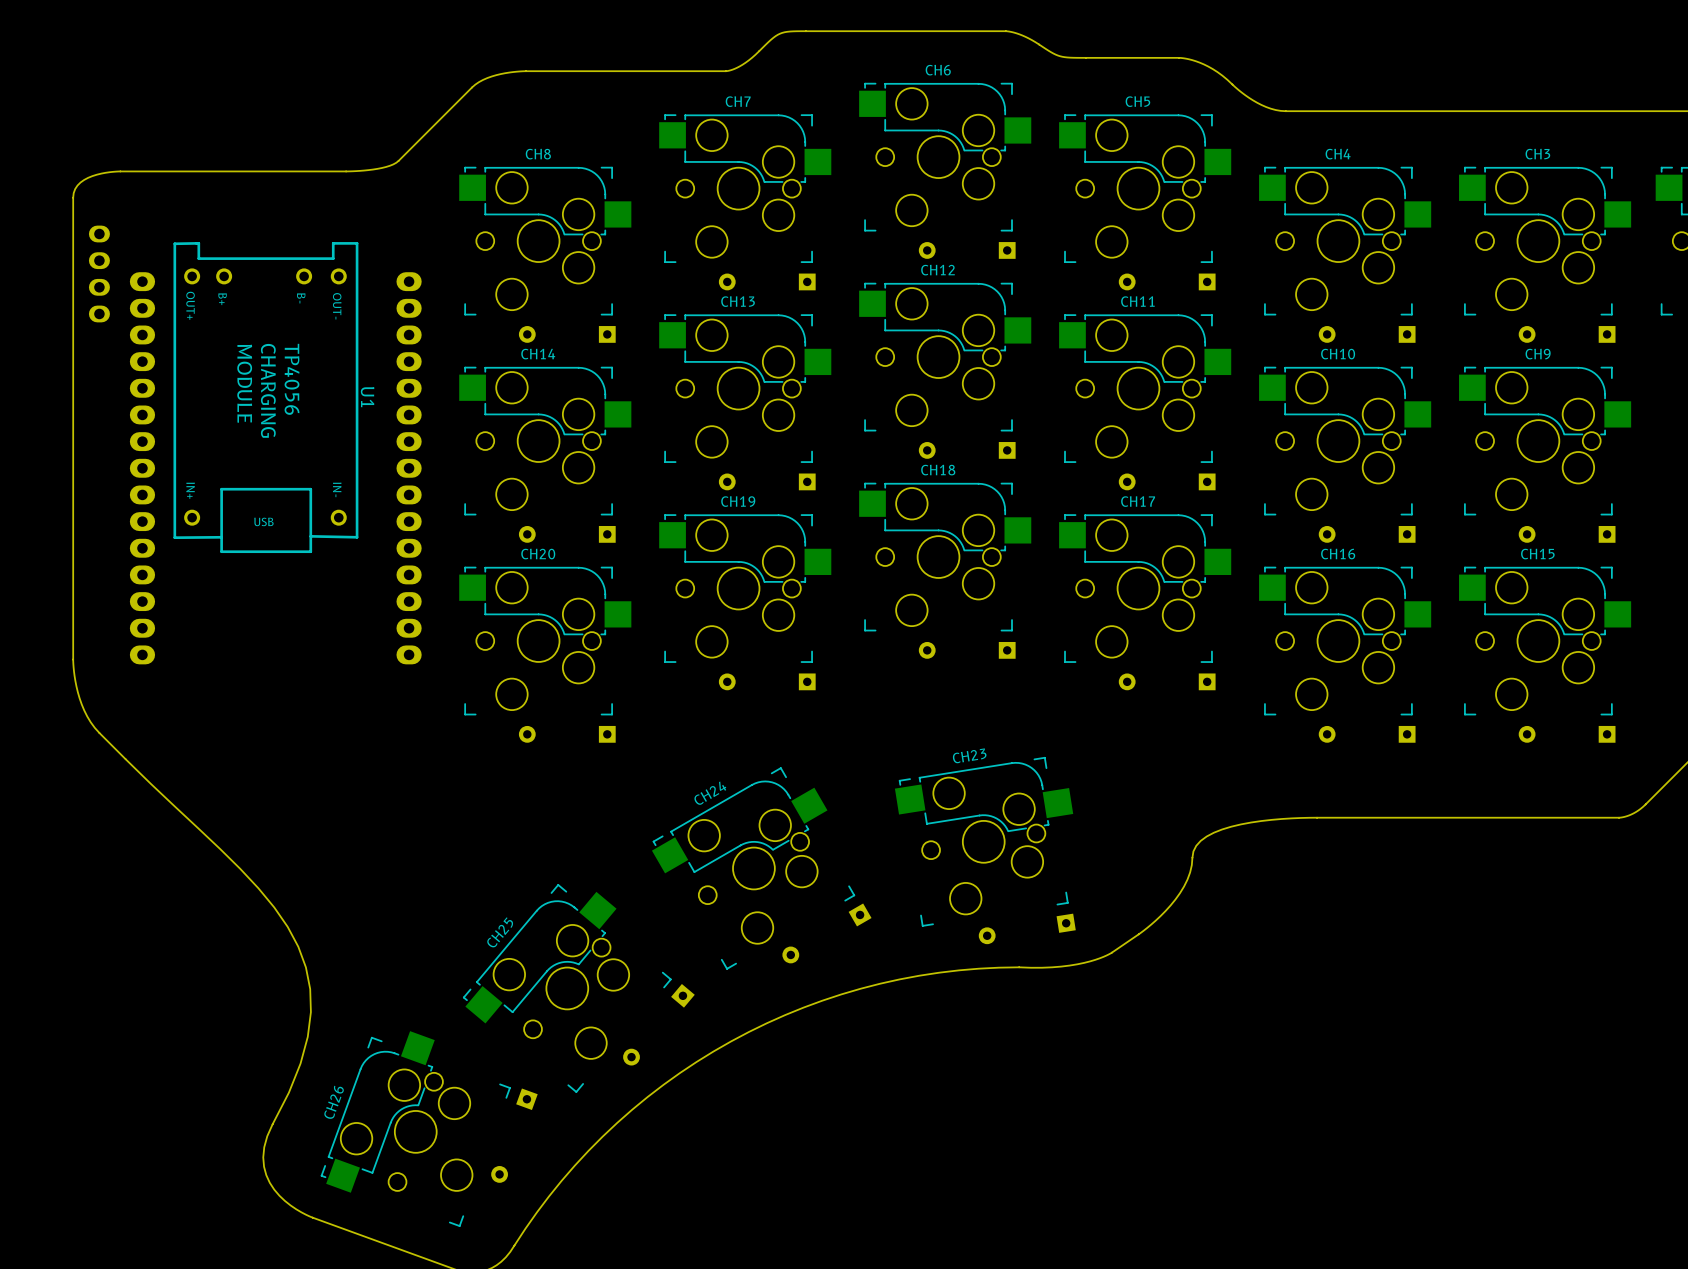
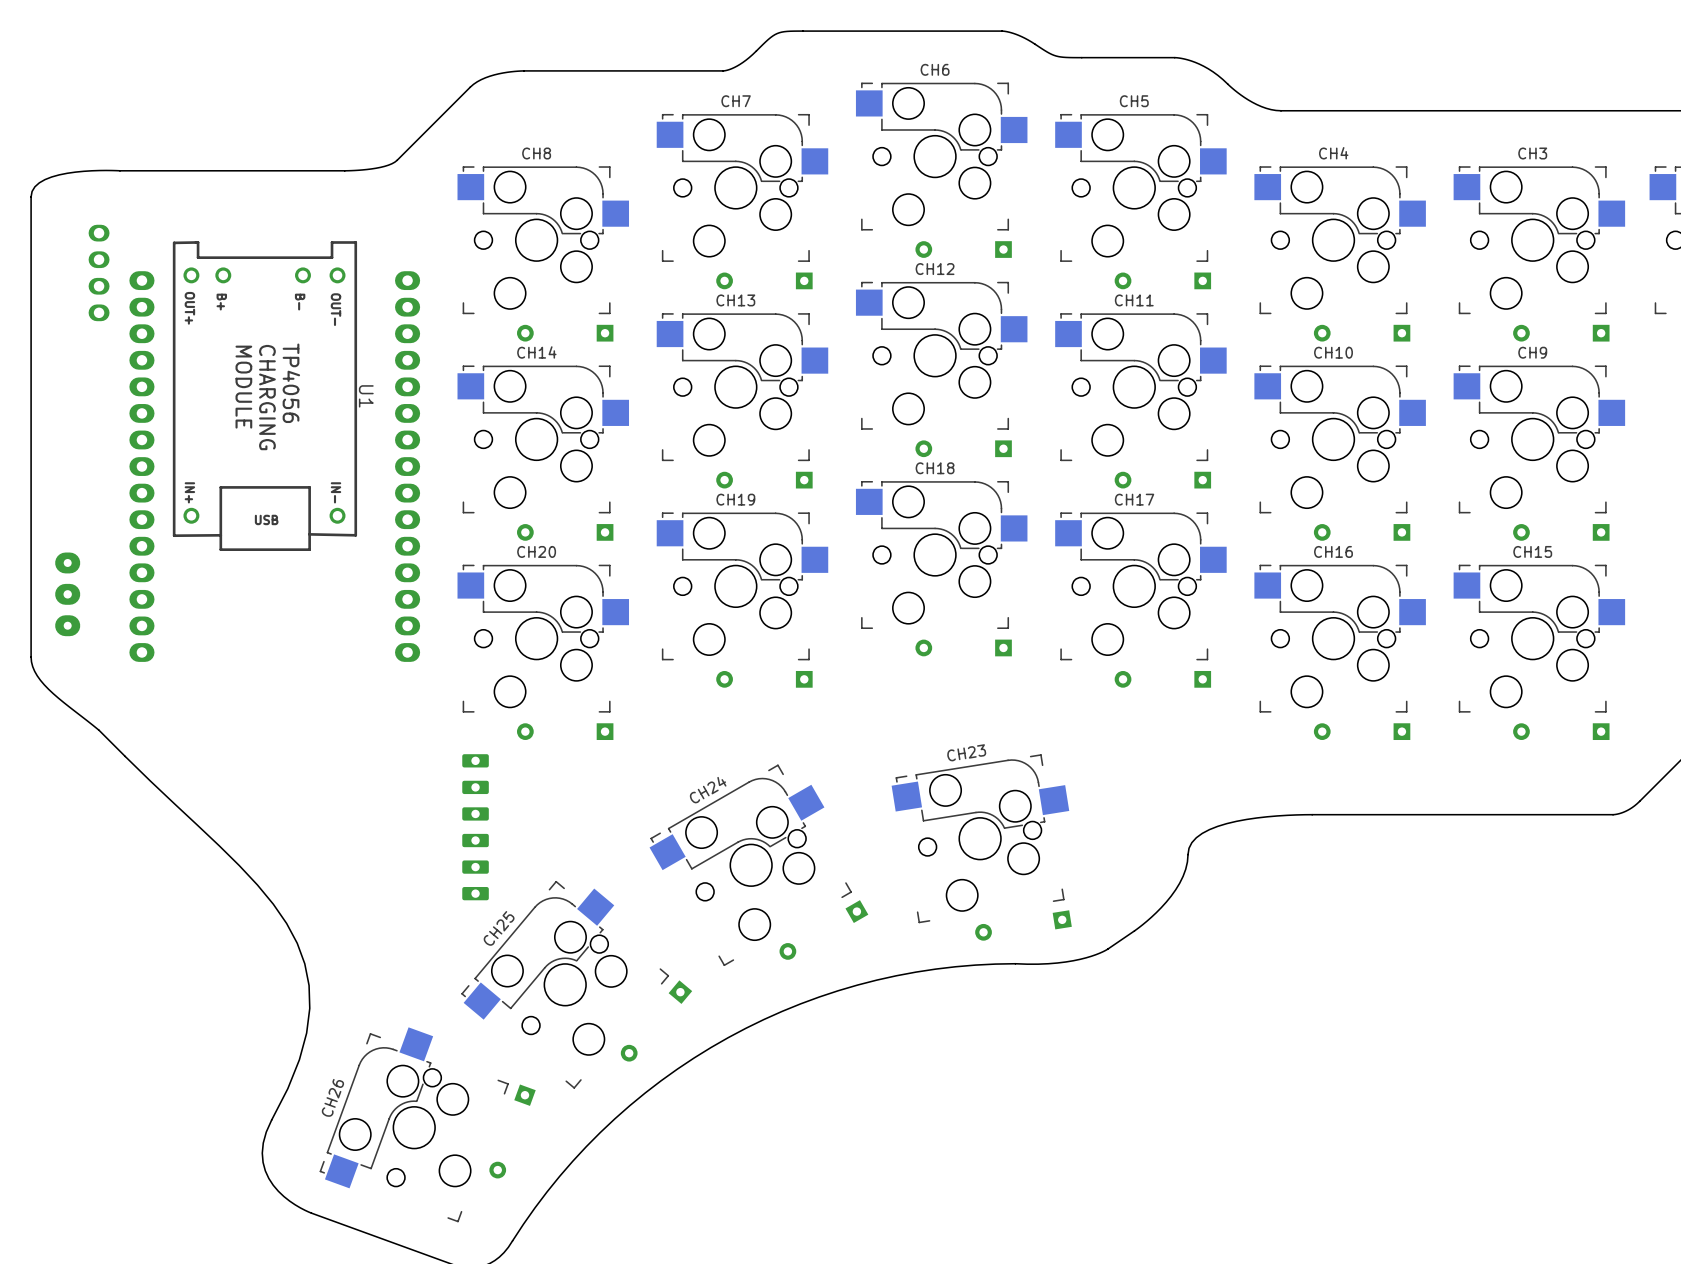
board edge: (120, 171) (101, 173) (84, 179) (75, 189) (73, 197) (73, 661) (76, 686) (81, 704) (90, 722) (99, 733) -> (119, 170) (83, 171) (51, 176) (34, 186) (31, 196) (31, 661) (37, 675) (48, 689) (99, 730)
part: none -> (67, 594)
part: none -> (475, 827)

